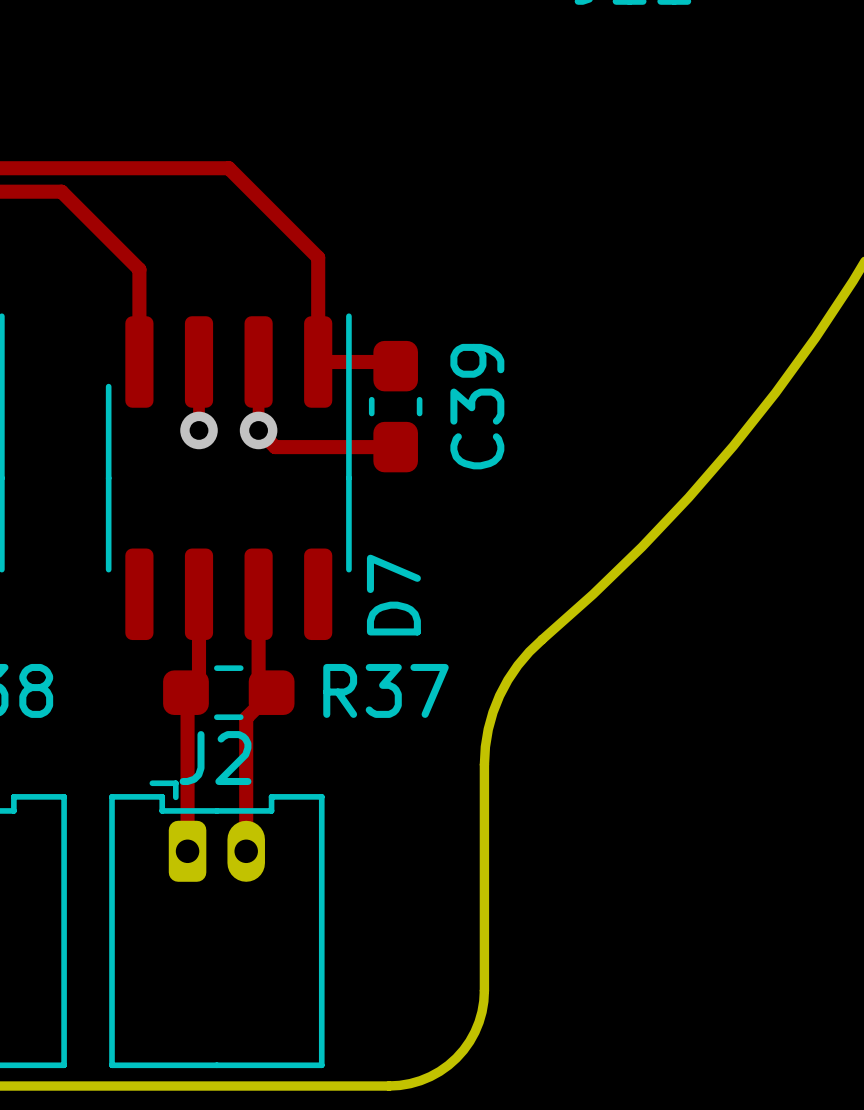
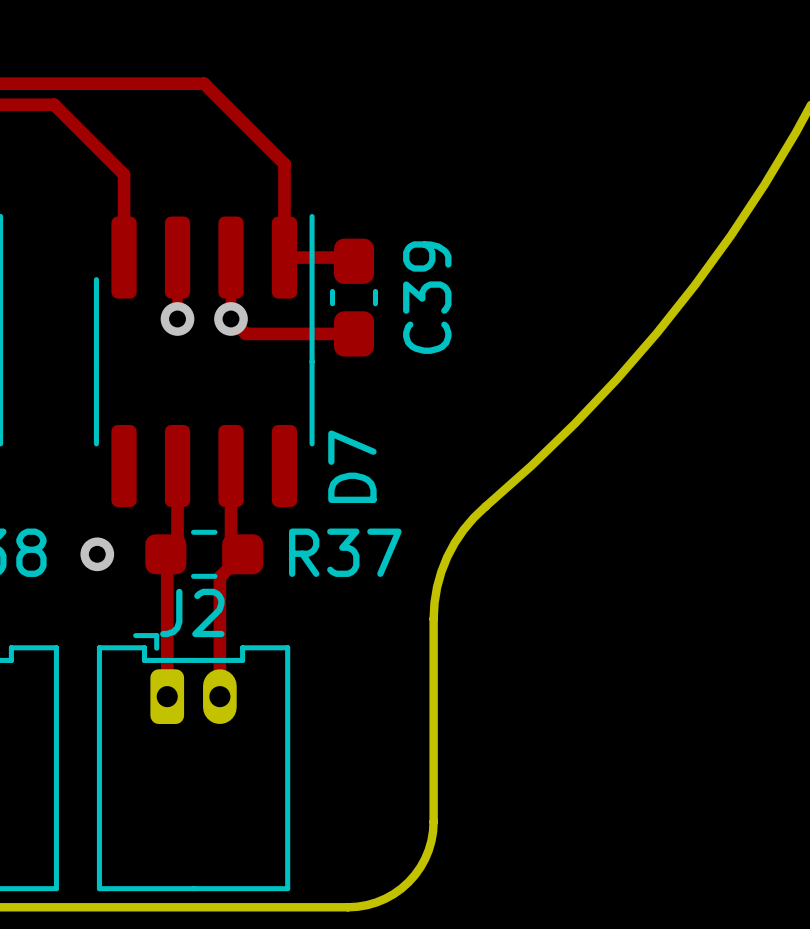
via: none -> (97, 554)

